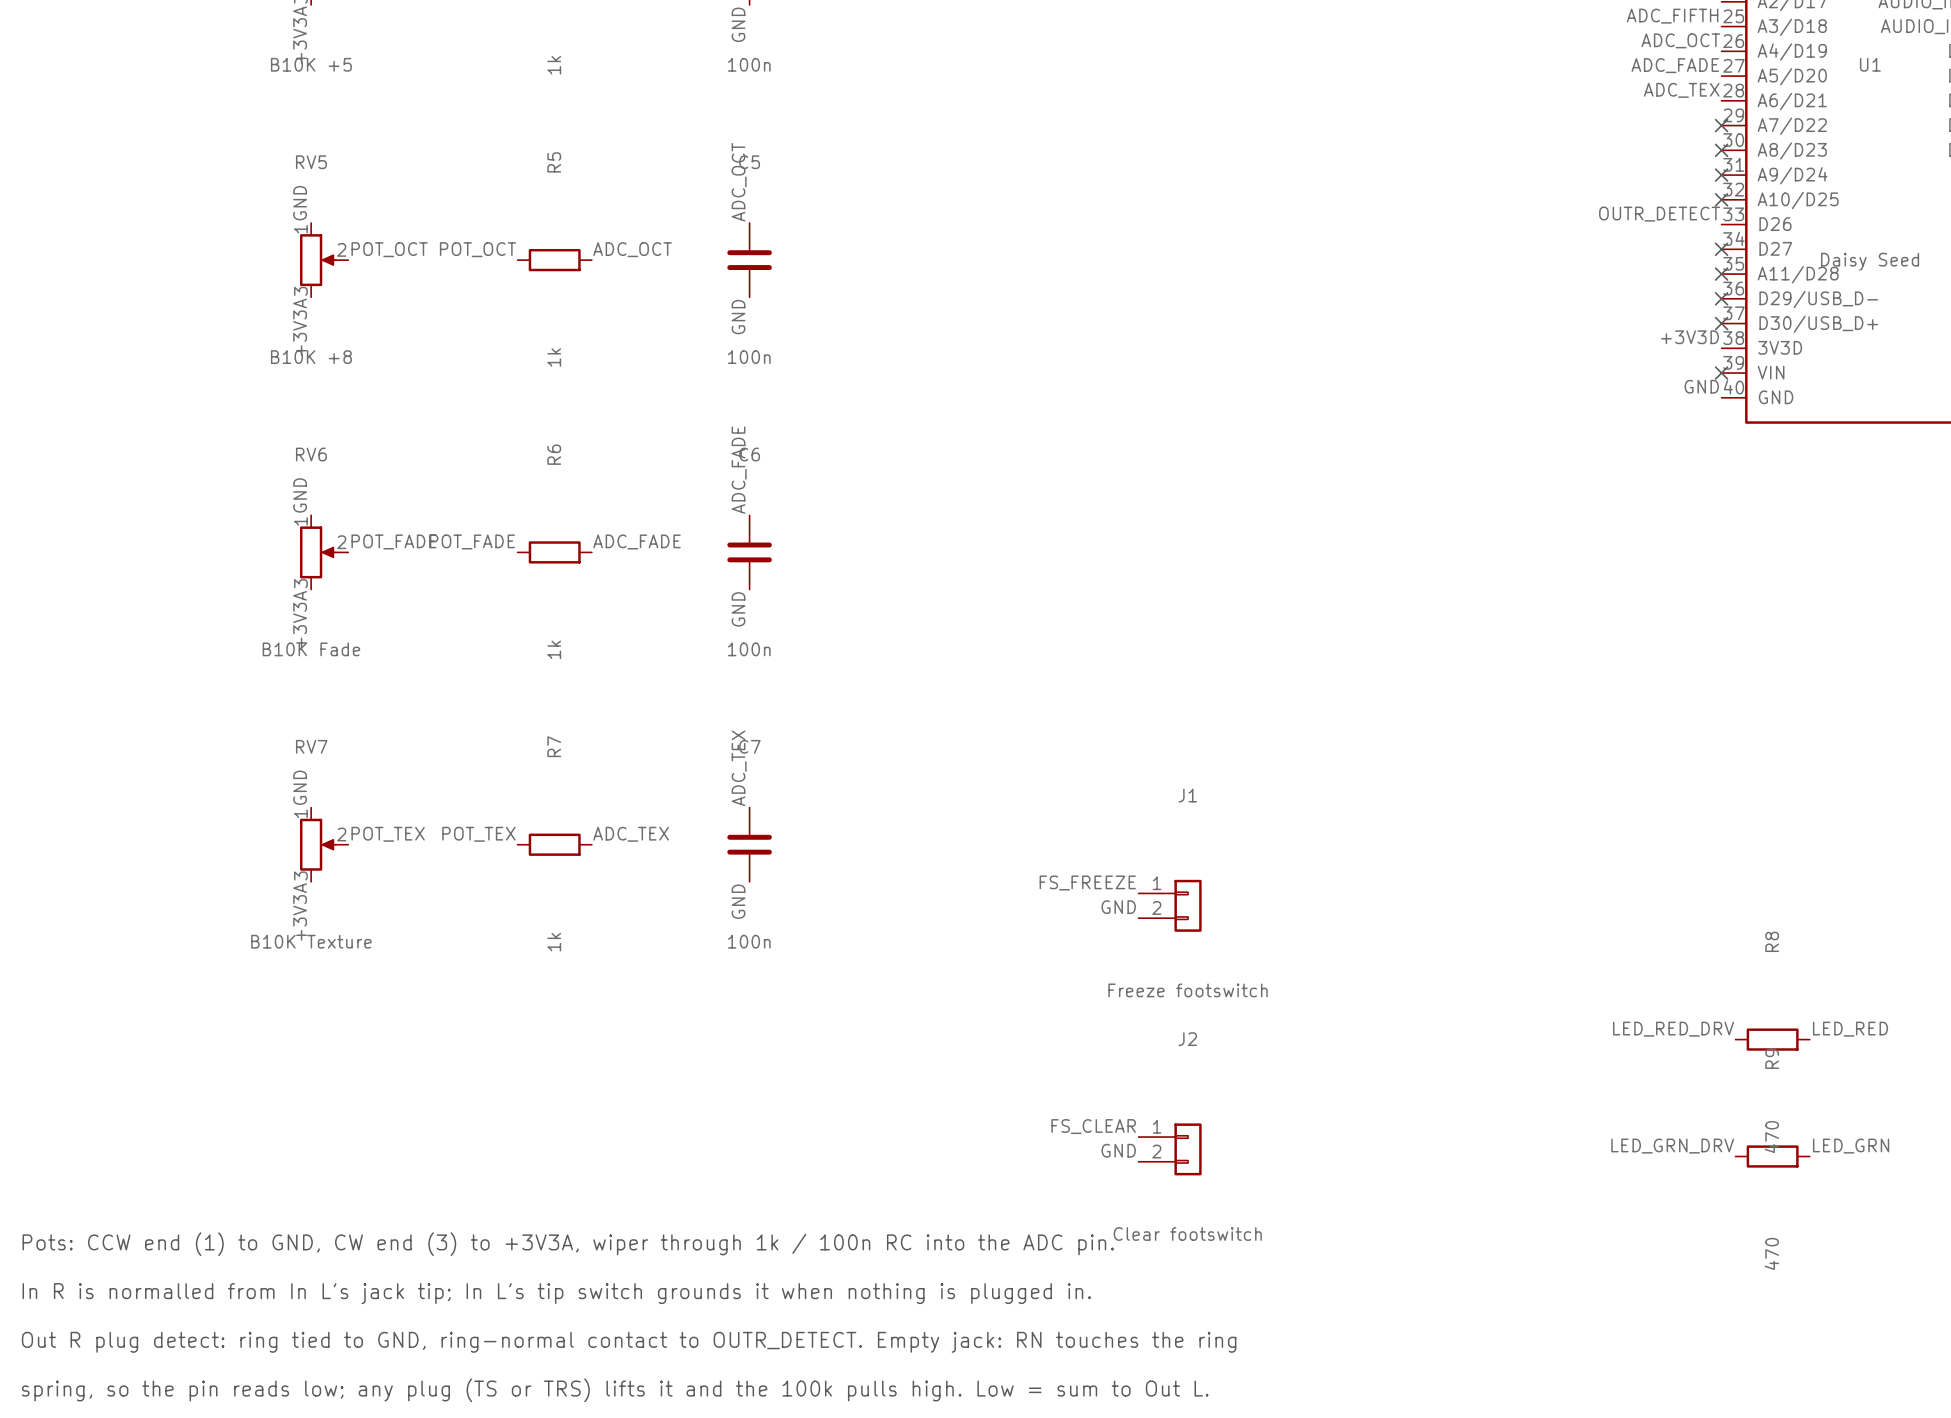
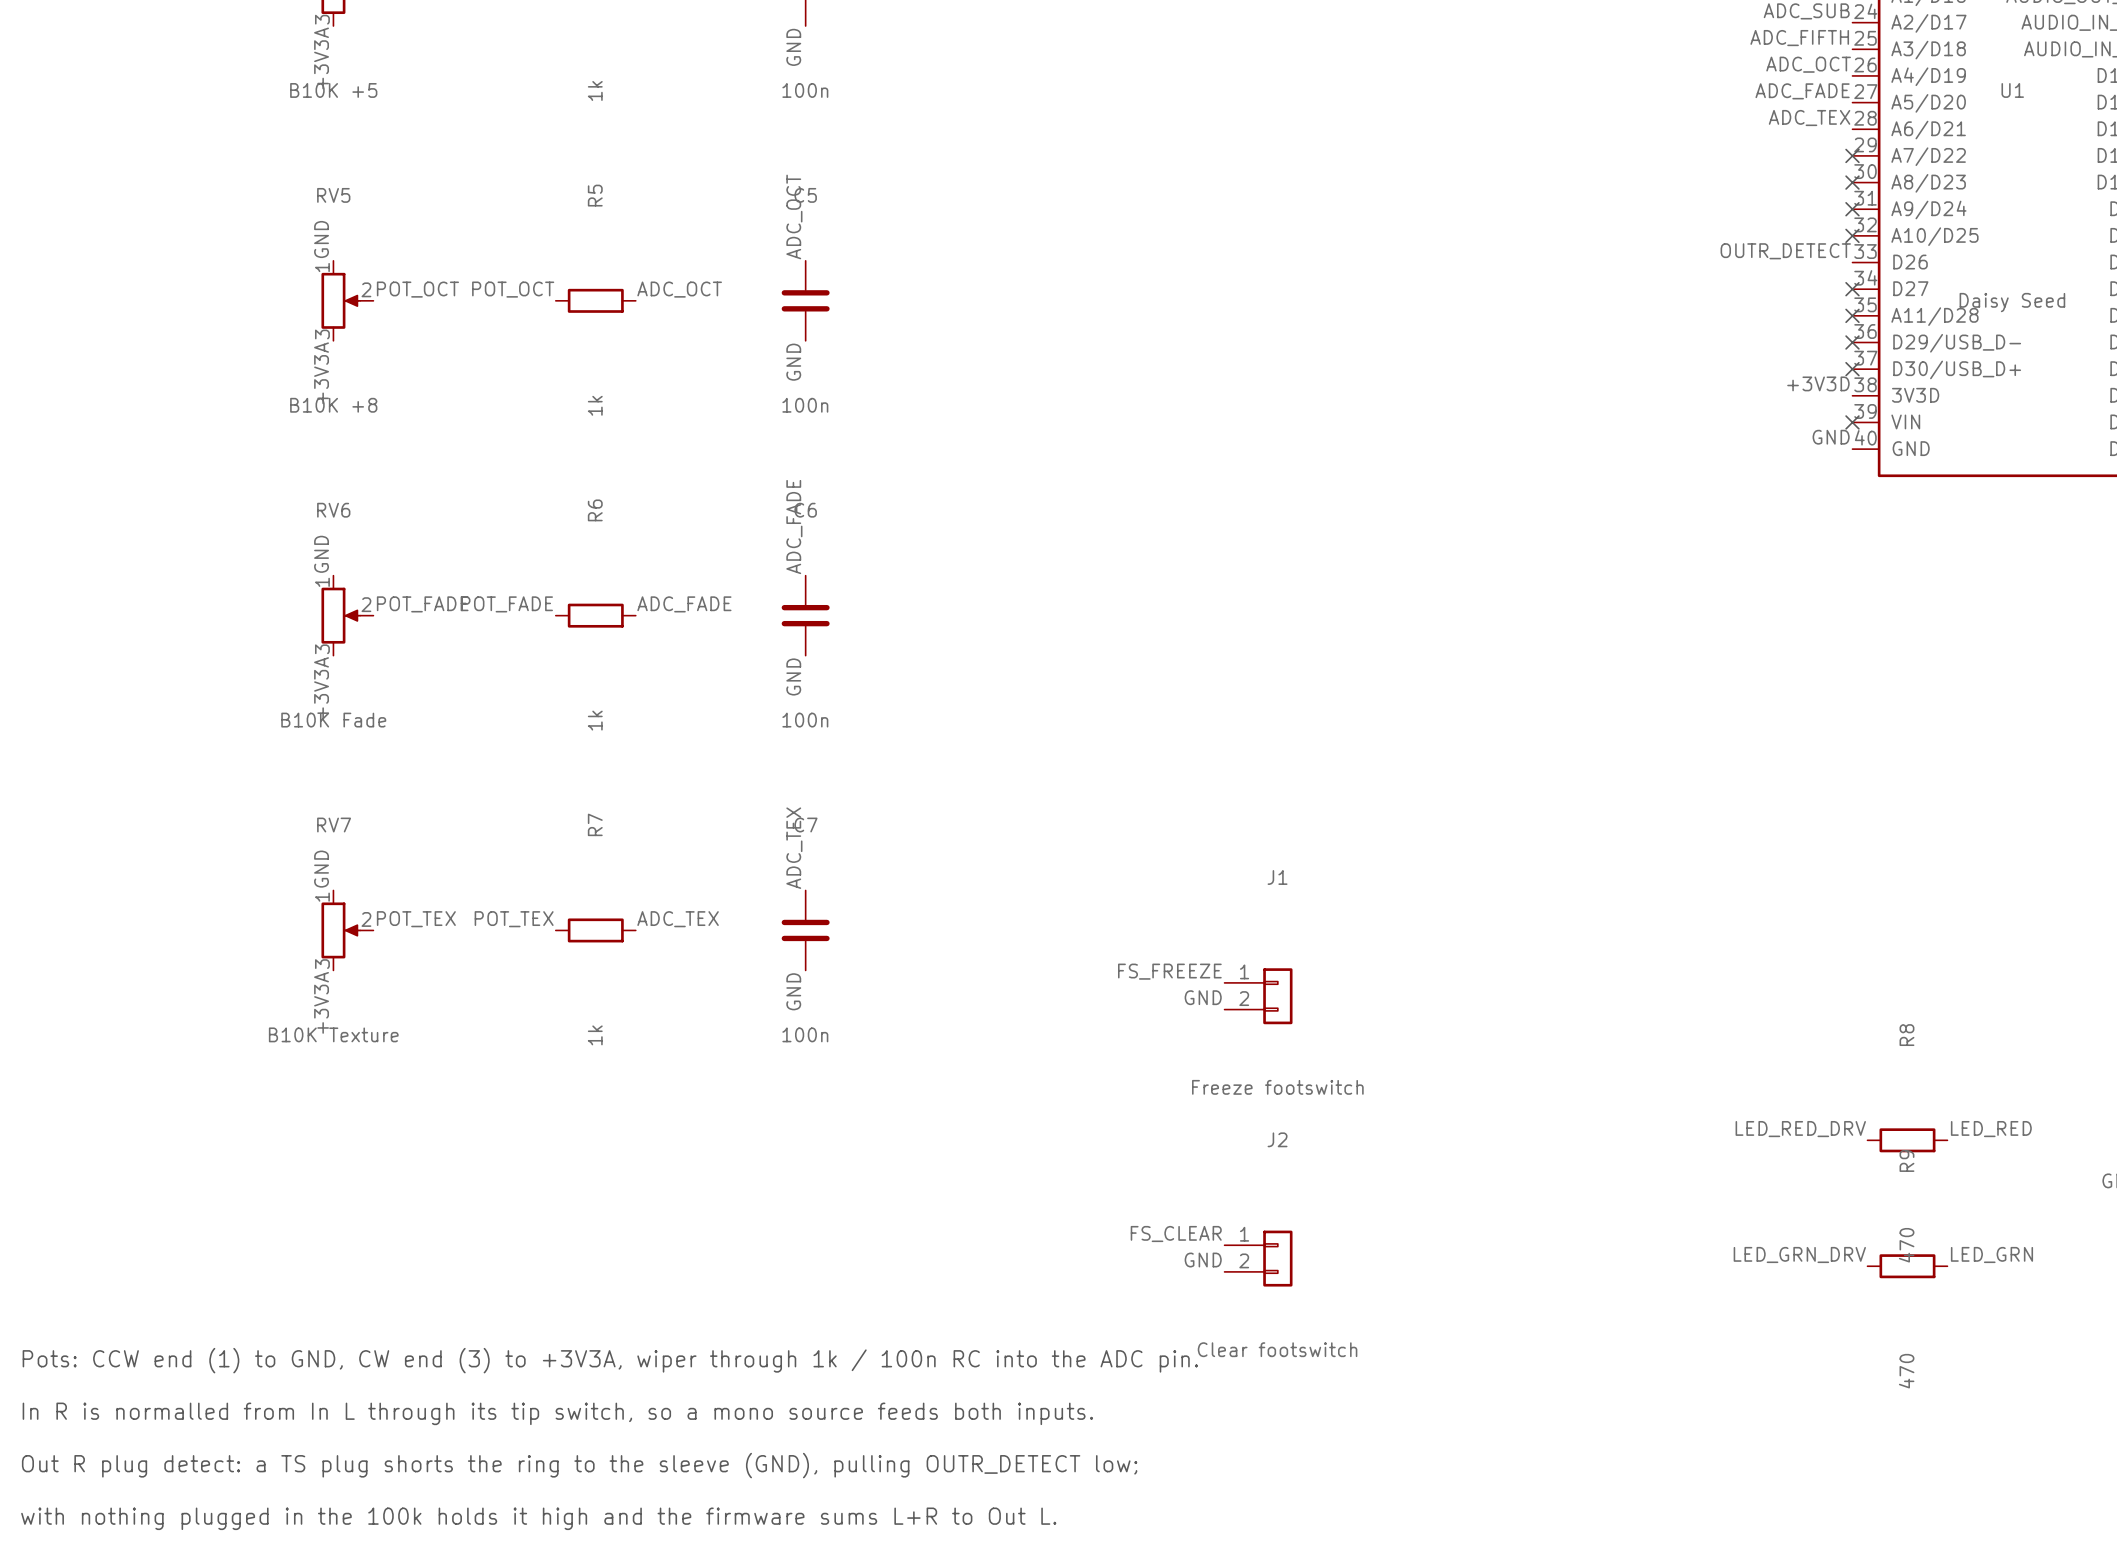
text: In R is normalled from In L's jack tip; In L's tip switch grounds it when nothing is plugged in. (556, 1293) -> In R is normalled from In L through its tip switch, so a mono source feeds both inputs. (557, 1413)
text: Out R plug detect: ring tied to GND, ring-normal contact to OUTR_DETECT. Empty jack: RN touches the ring (629, 1342) -> Out R plug detect: a TS plug shorts the ring to the sleeve (GND), pulling OUTR_DETECT low; (579, 1465)
text: spring, so the pin reads low; any plug (TS or TRS) lifts it and the 100k pulls high. Low = sum to Out L. (615, 1390) -> with nothing plugged in the 100k holds it high and the firmware sums L+R to Out L. (538, 1518)

